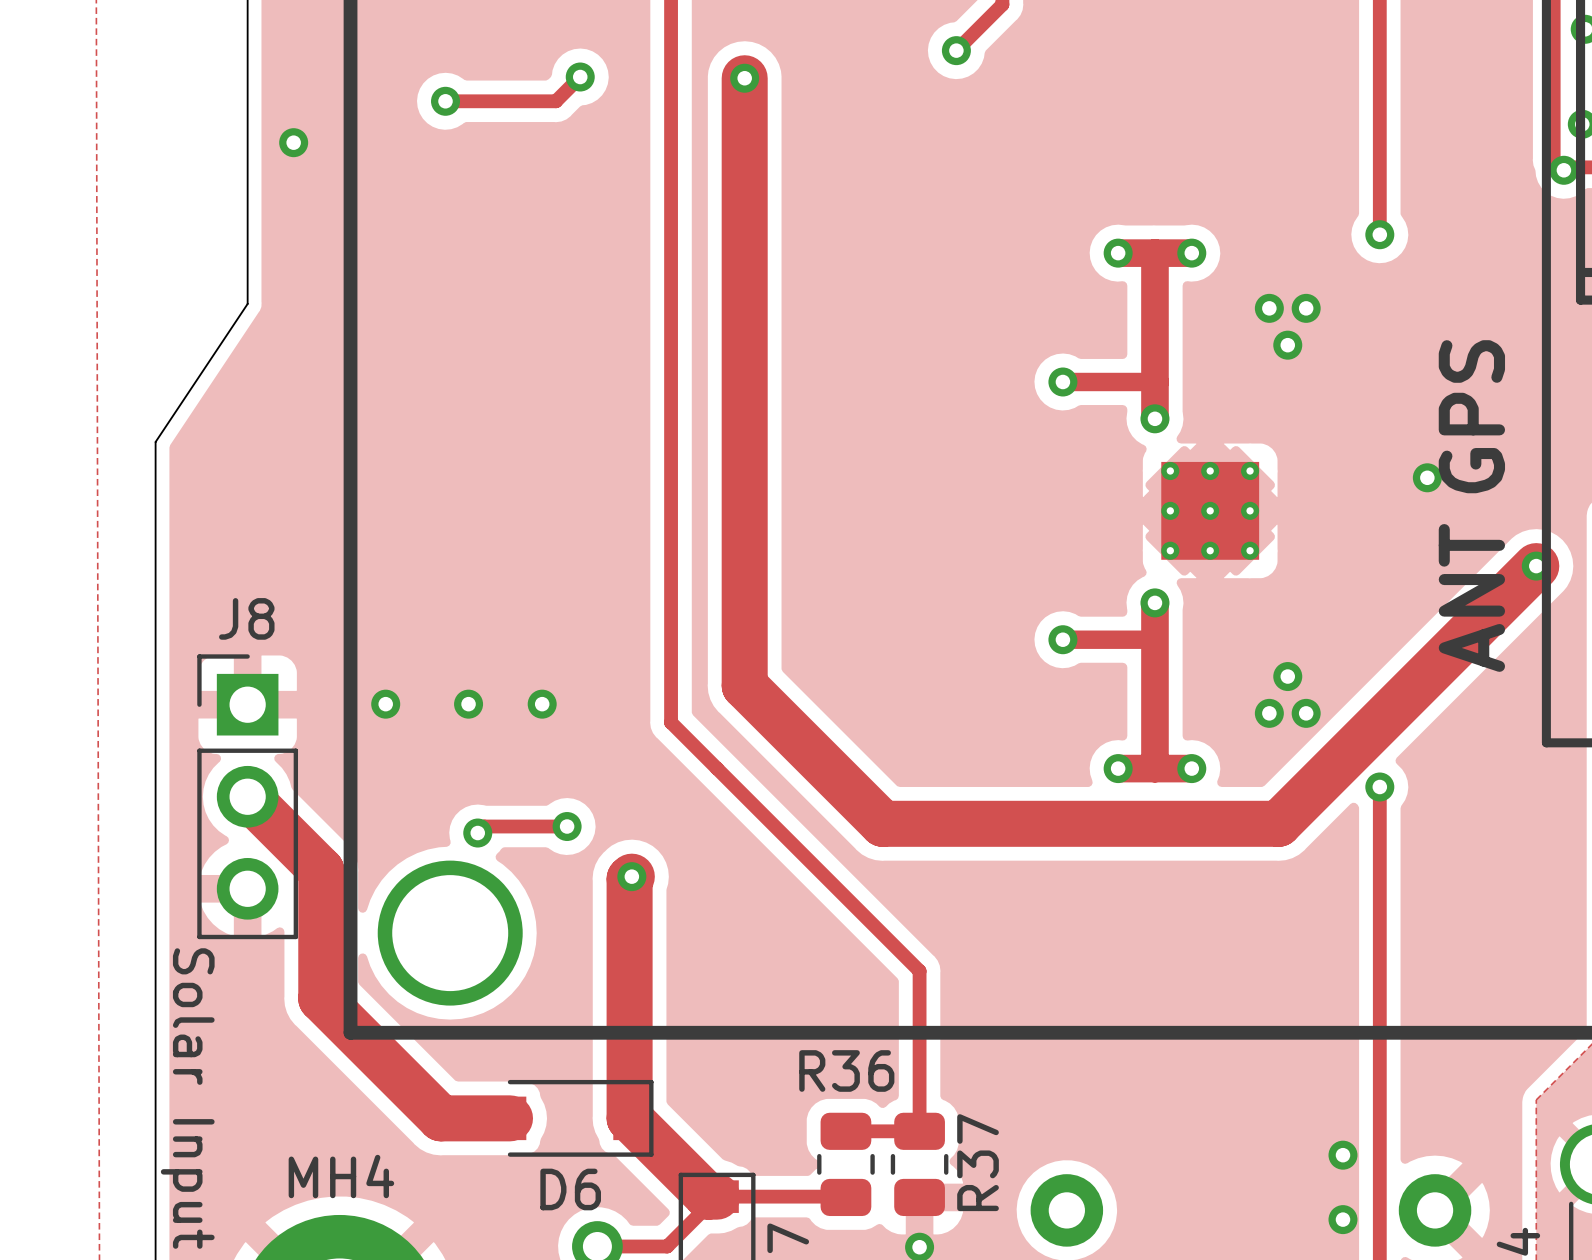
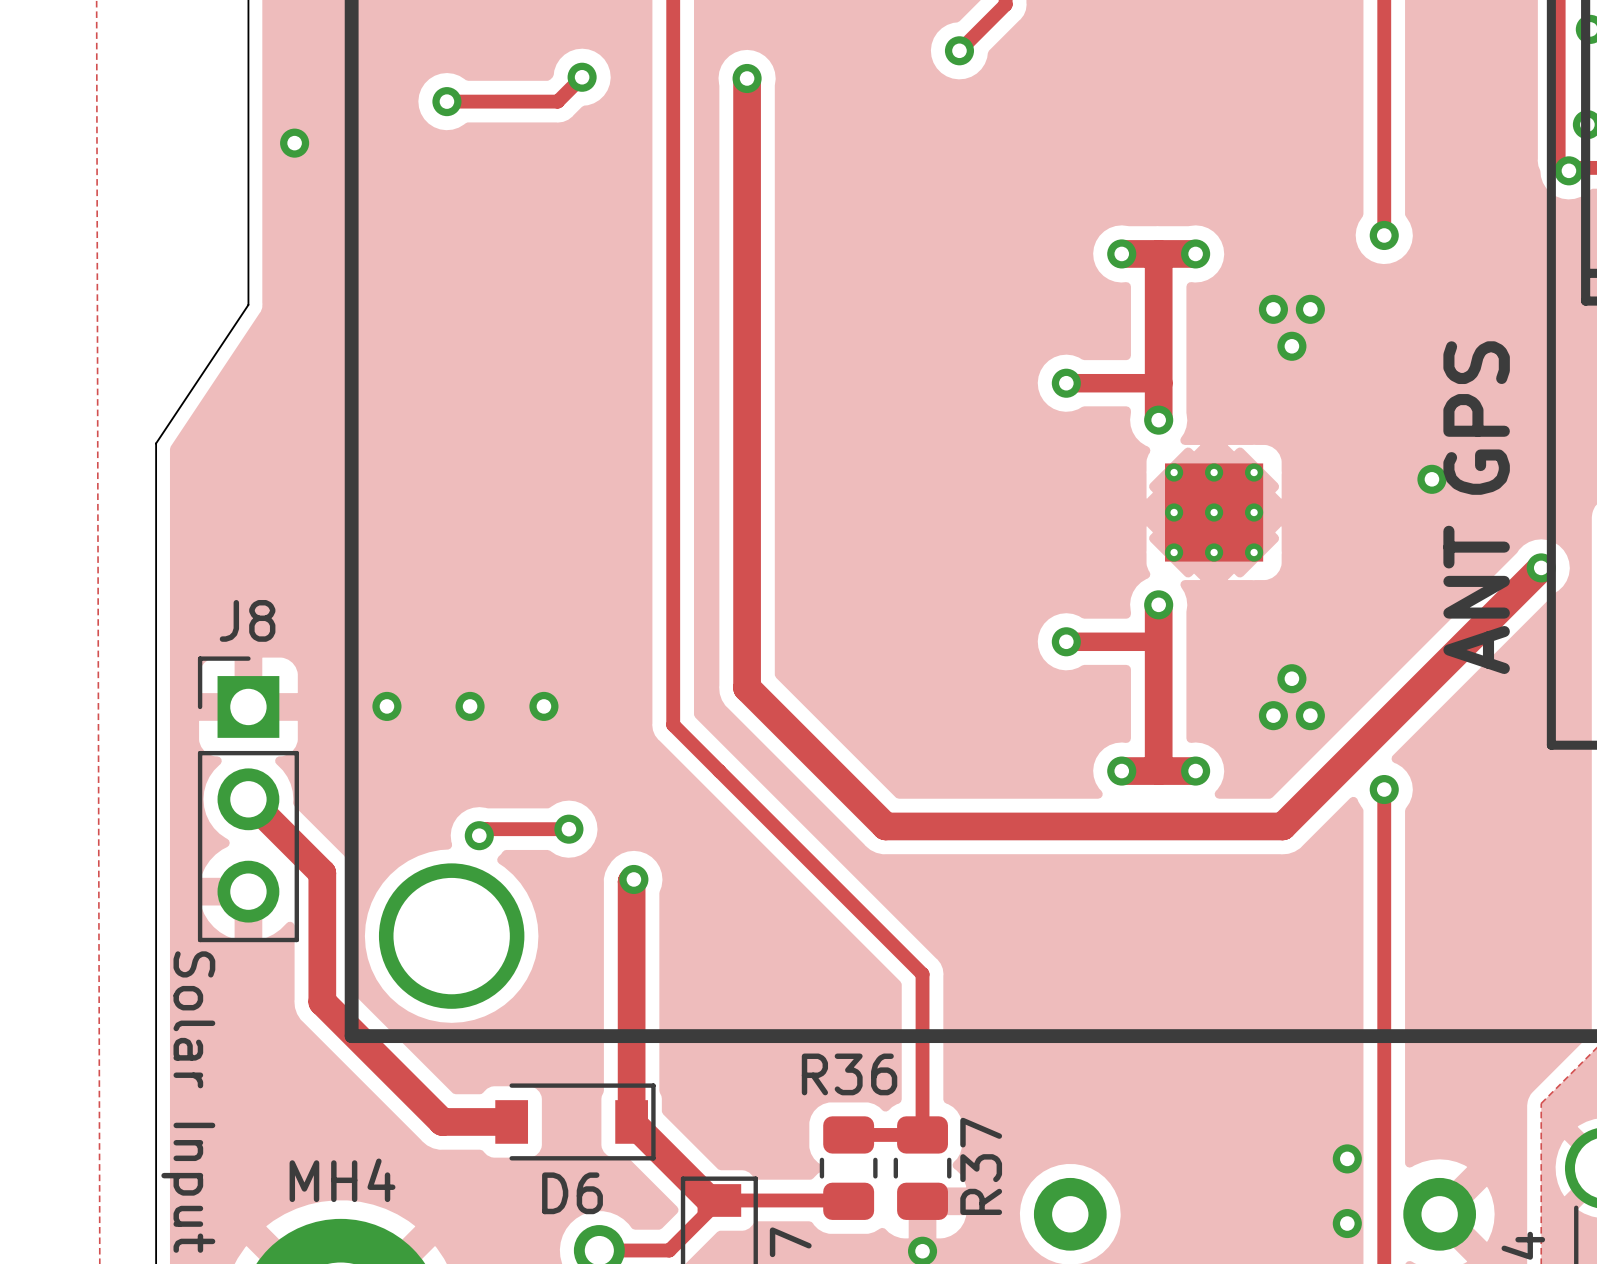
track width: thick (744, 78) (744, 685) (882, 823) (1278, 823) (1536, 566) -> thin (747, 78) (747, 687) (885, 826) (1282, 826) (1541, 567)
track width: thick (247, 796) (321, 870) (321, 998) (440, 1118) (510, 1118) -> thin (248, 799) (322, 873) (322, 1001) (442, 1121) (511, 1121)
track width: thick (631, 876) (629, 878) (629, 1118) (707, 1196) (717, 1196) -> thin (633, 879) (631, 881) (631, 1121) (710, 1200) (719, 1200)

